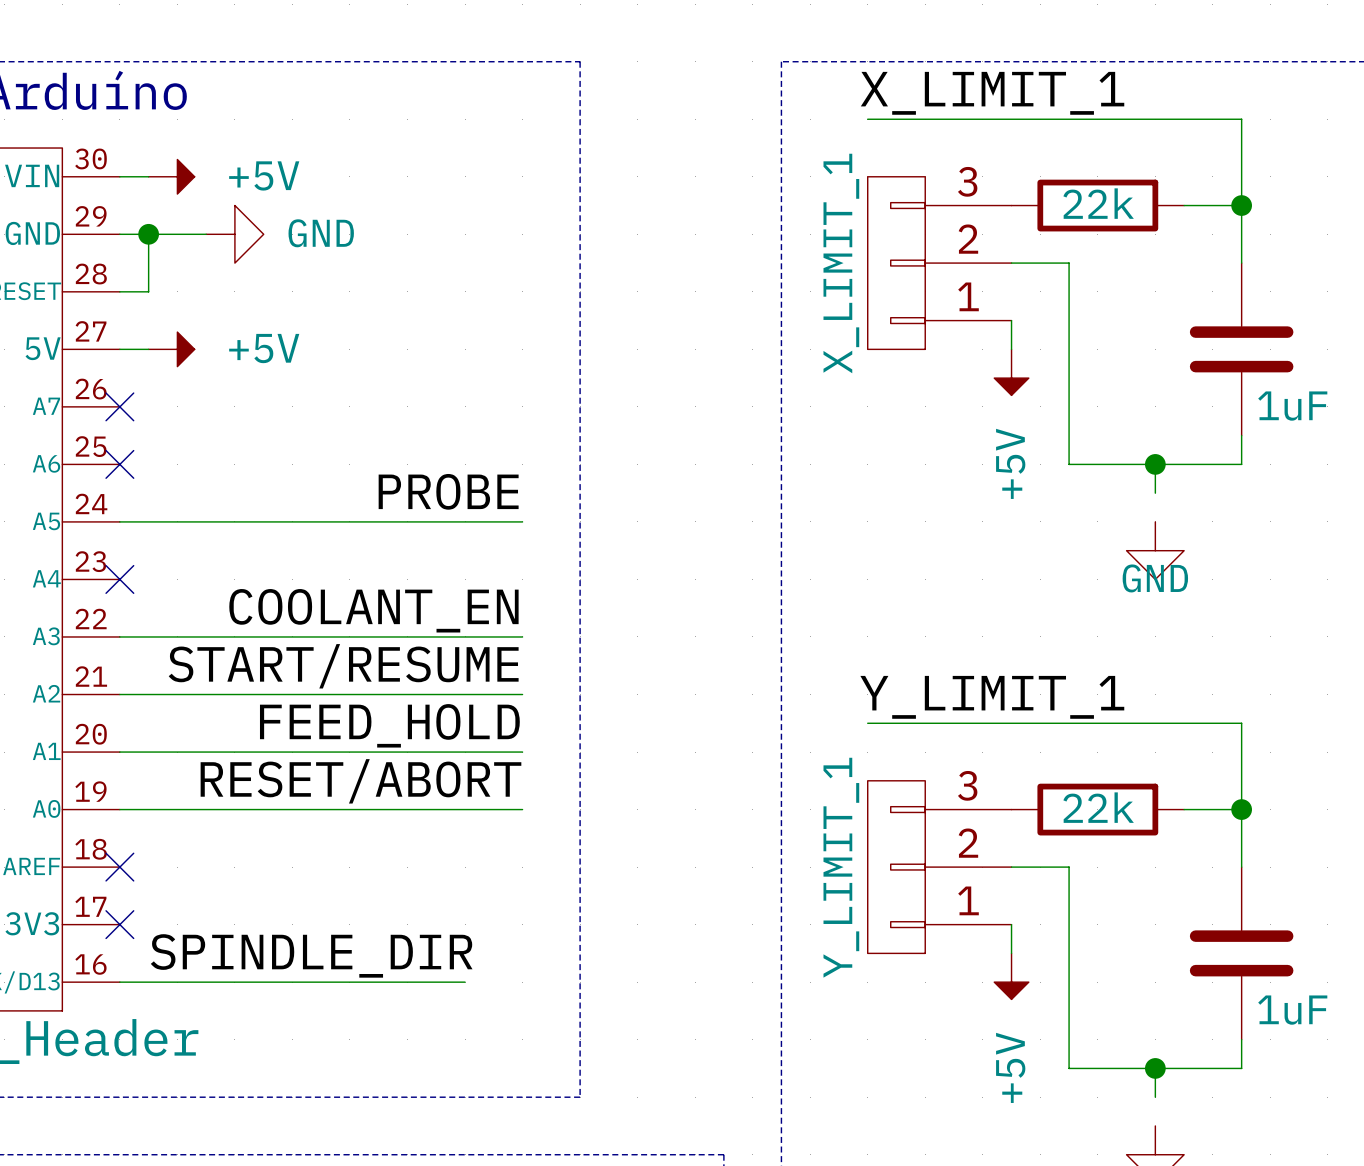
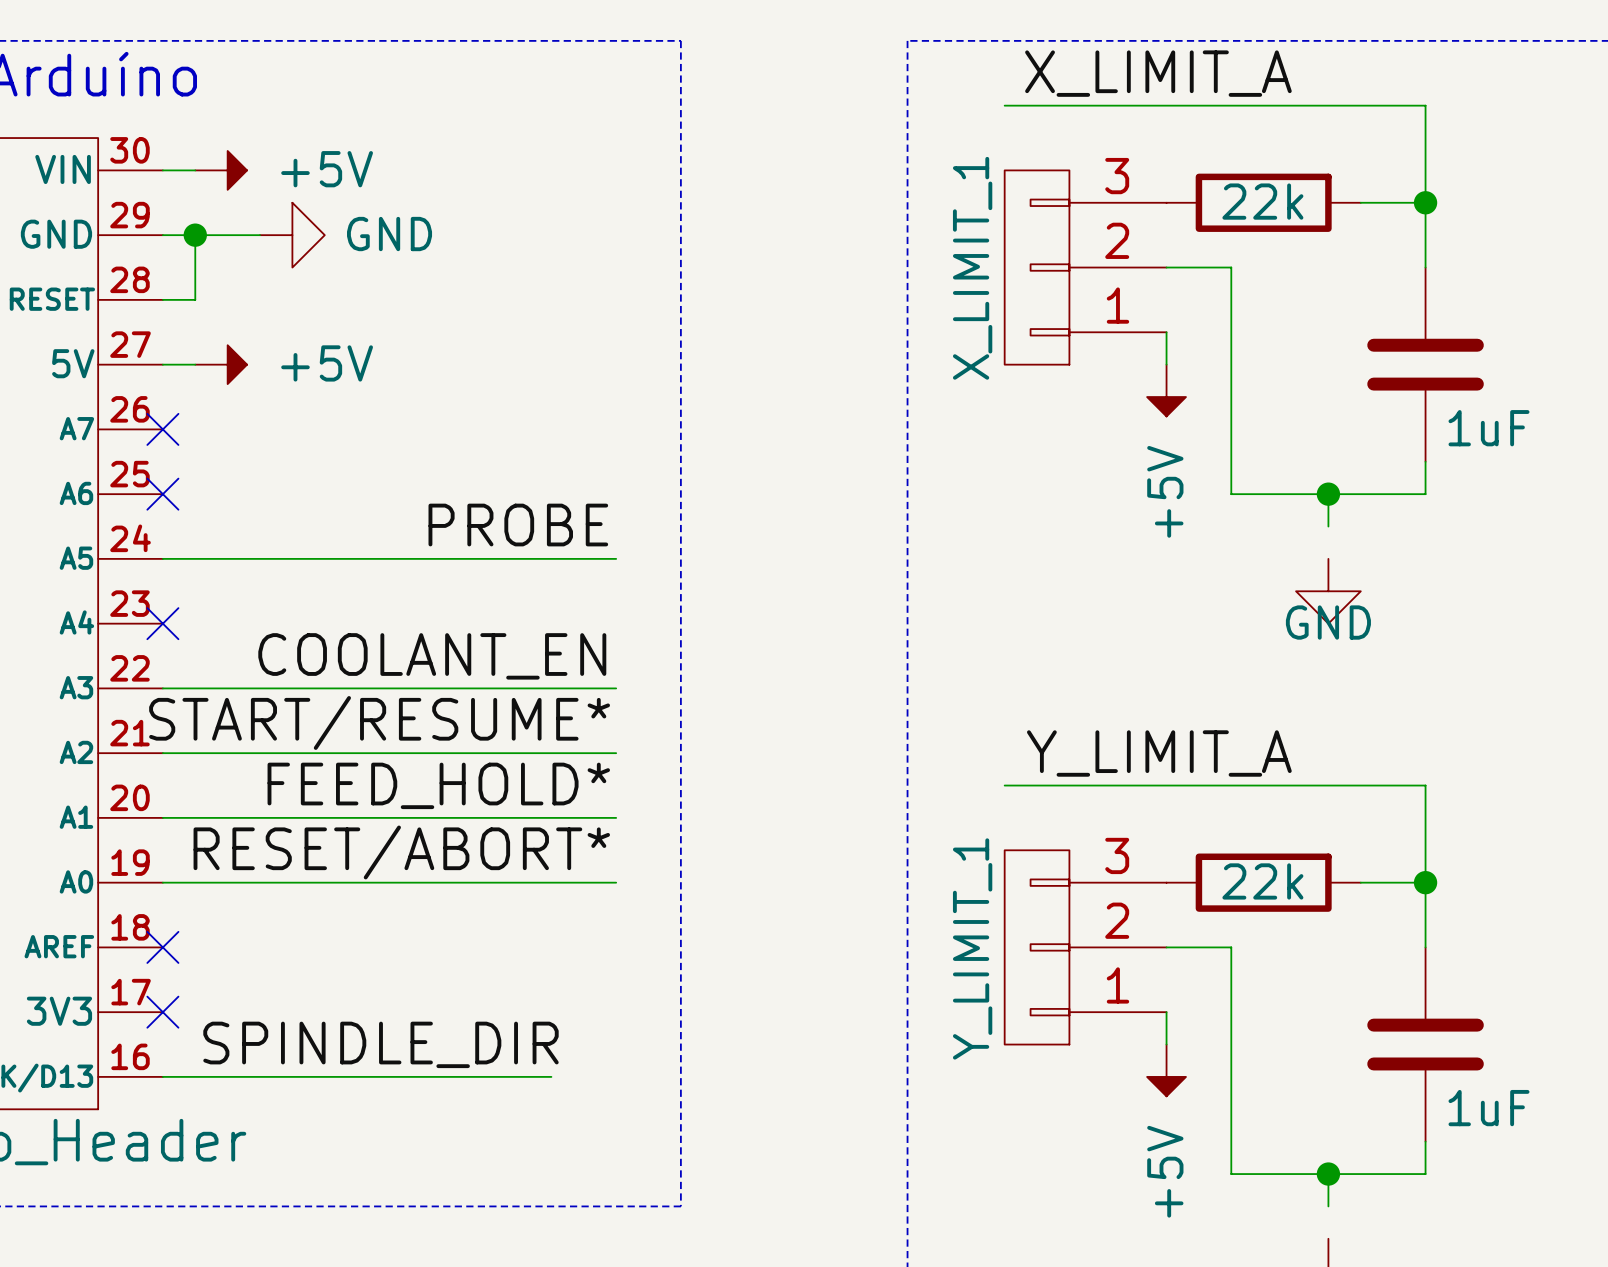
label: X_LIMIT_1 (992, 93) -> X_LIMIT_A (1158, 73)
label: START/RESUME (343, 666) -> START/RESUME* (379, 722)
label: Y_LIMIT_1 (992, 697) -> Y_LIMIT_A (1159, 753)
label: FEED_HOLD (389, 725) -> FEED_HOLD* (438, 785)
label: RESET/ABORT (360, 781) -> RESET/ABORT* (401, 852)

